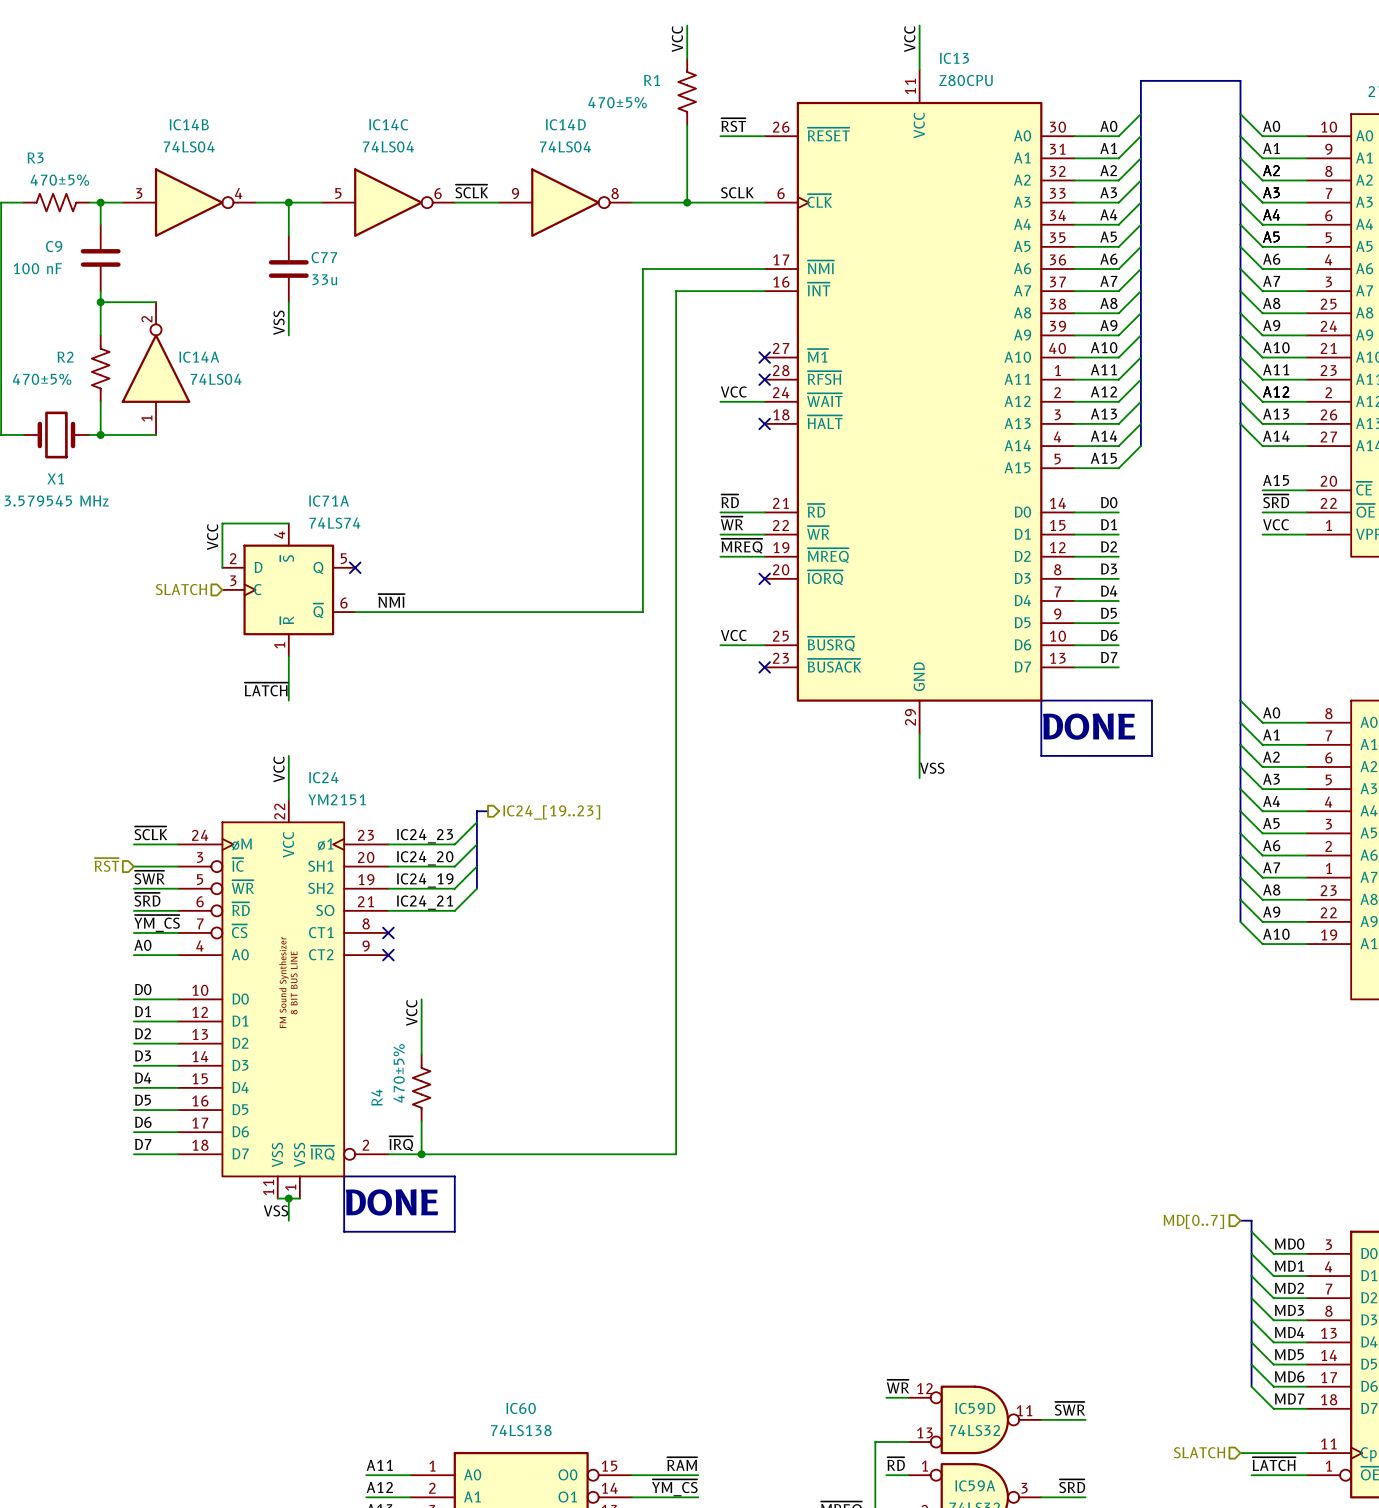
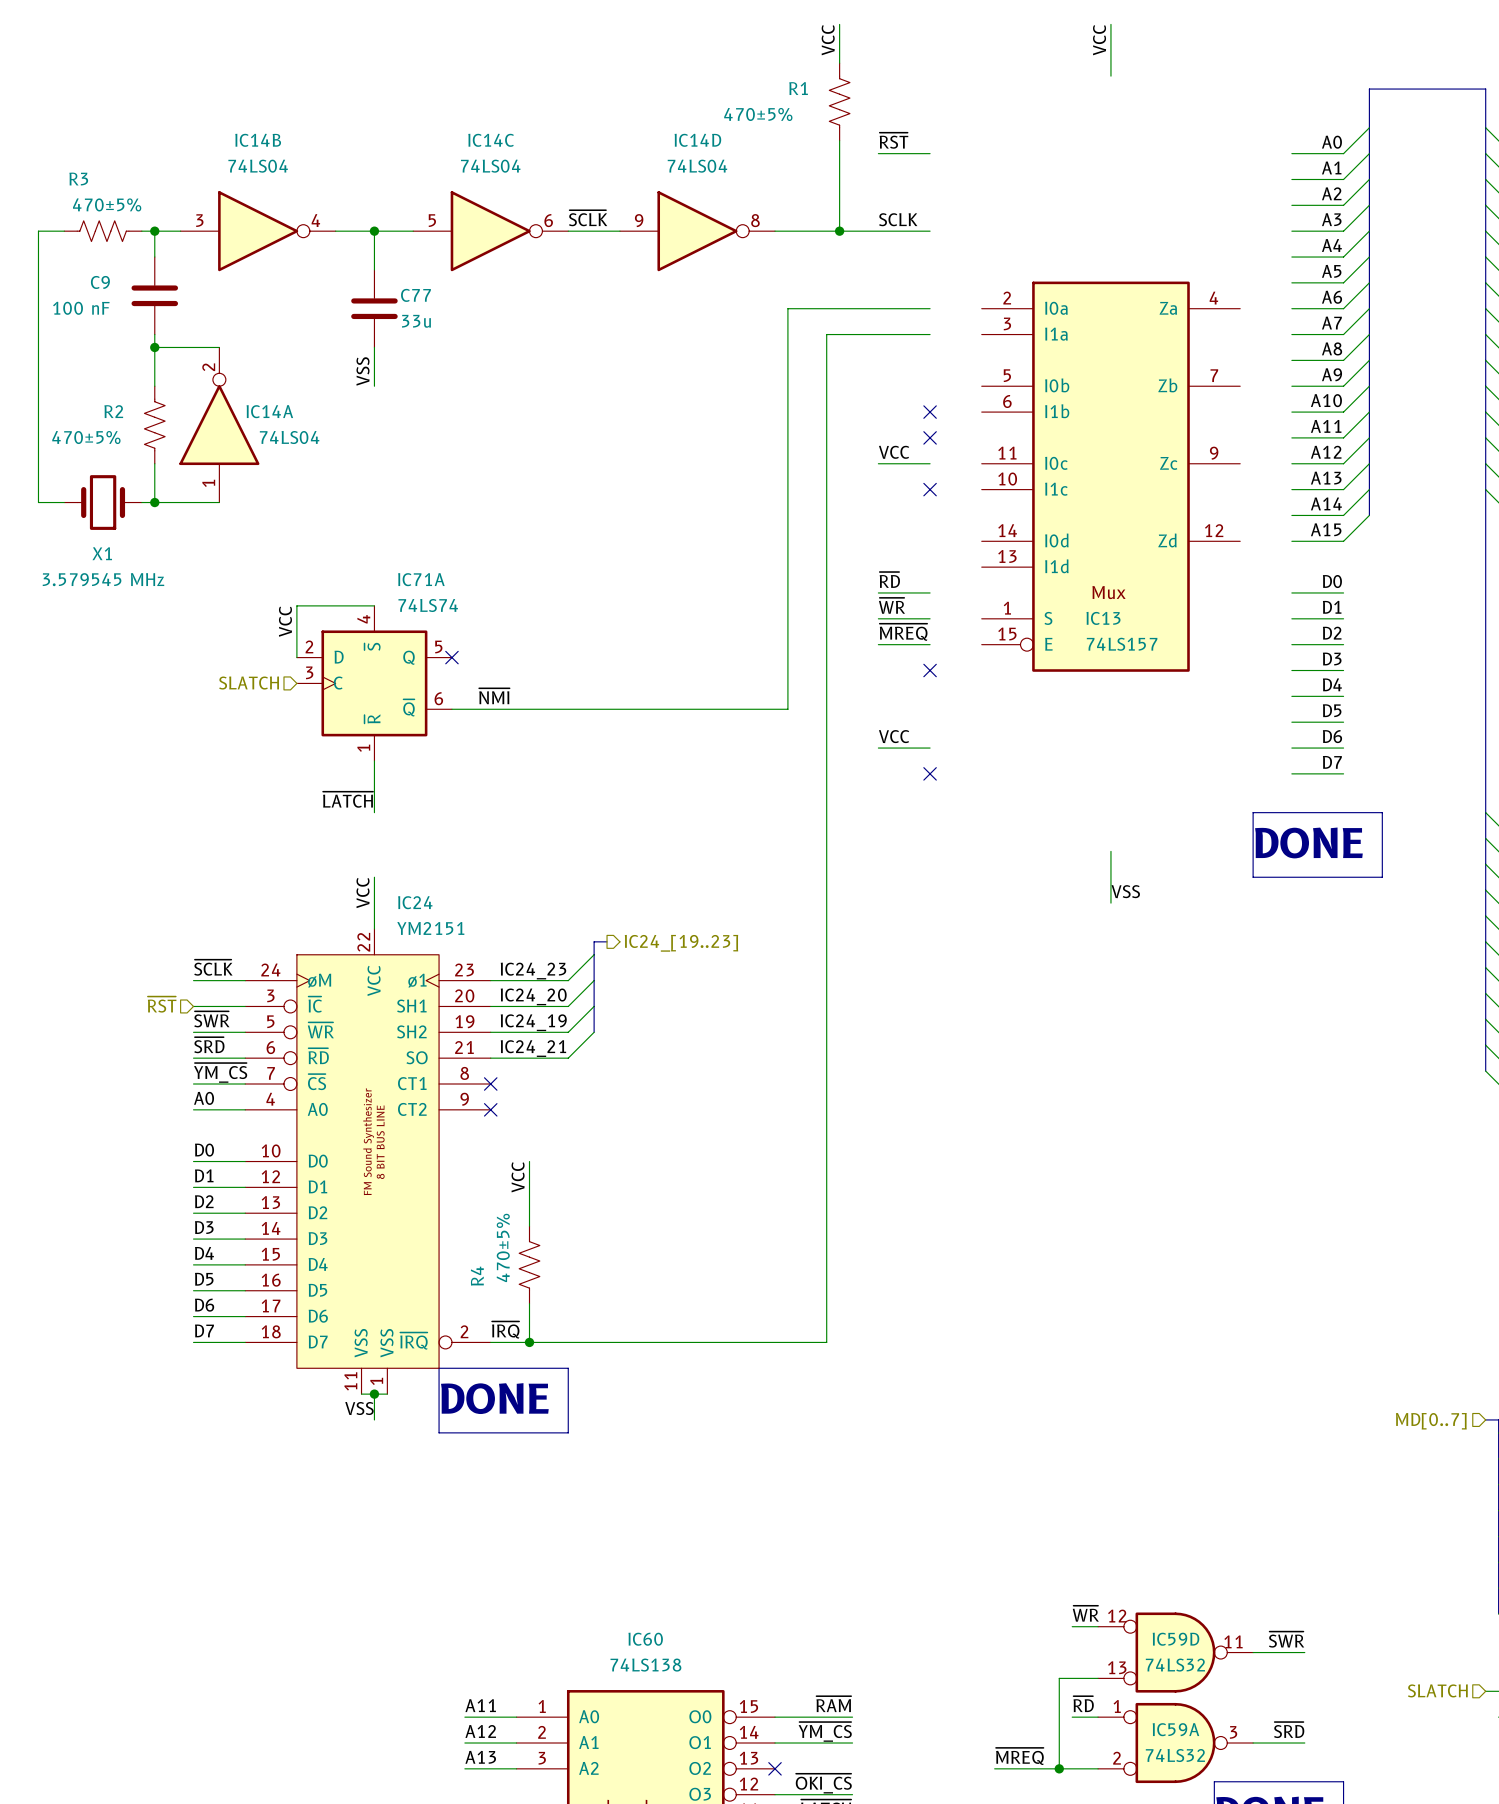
IC13 name position: IC13 (954, 58) -> IC13 (1103, 618)
IC13 symbol: [764, 69, 1075, 734] -> [981, 281, 1241, 672]
IC13 value: Z80CPU (965, 80) -> 74LS157 (1122, 644)

